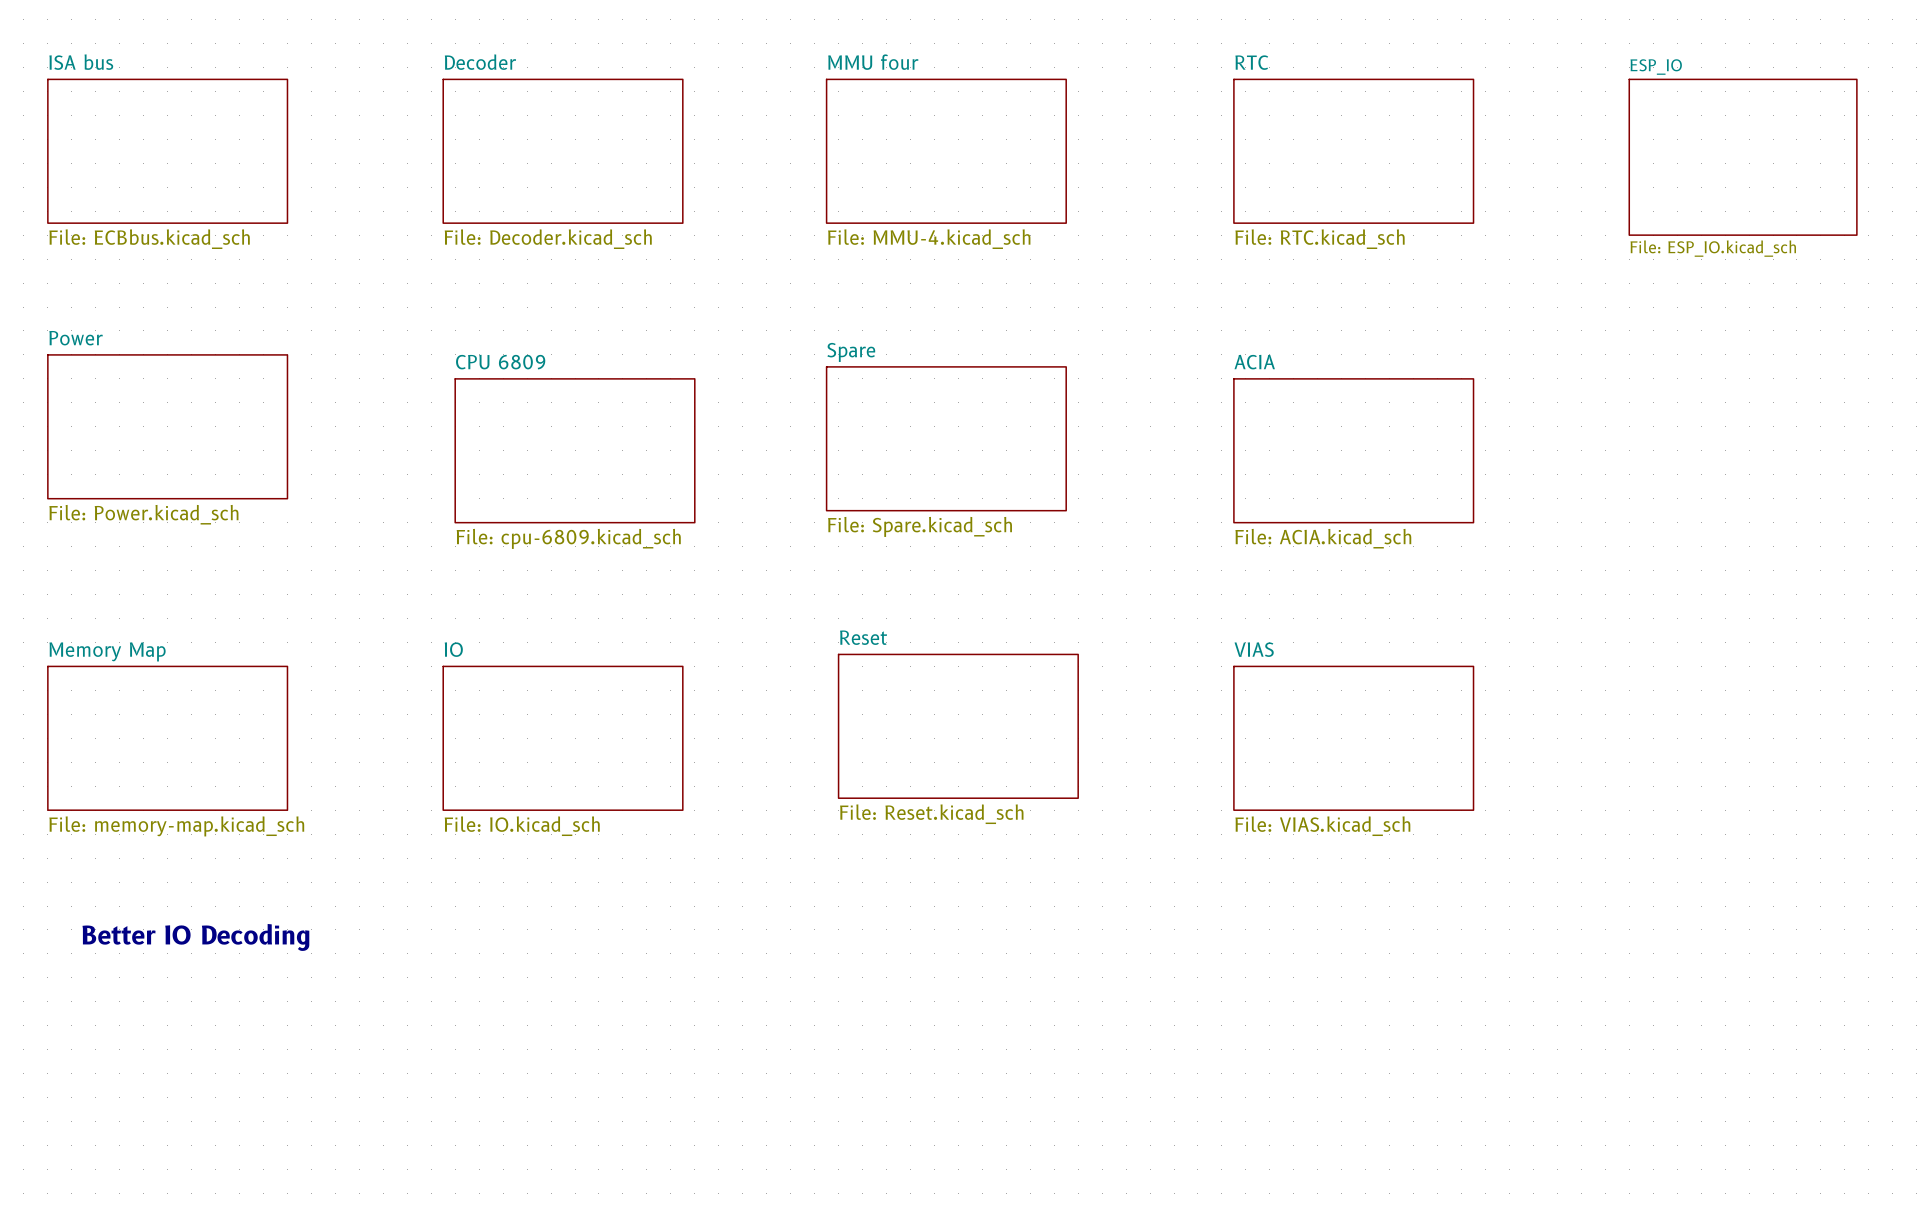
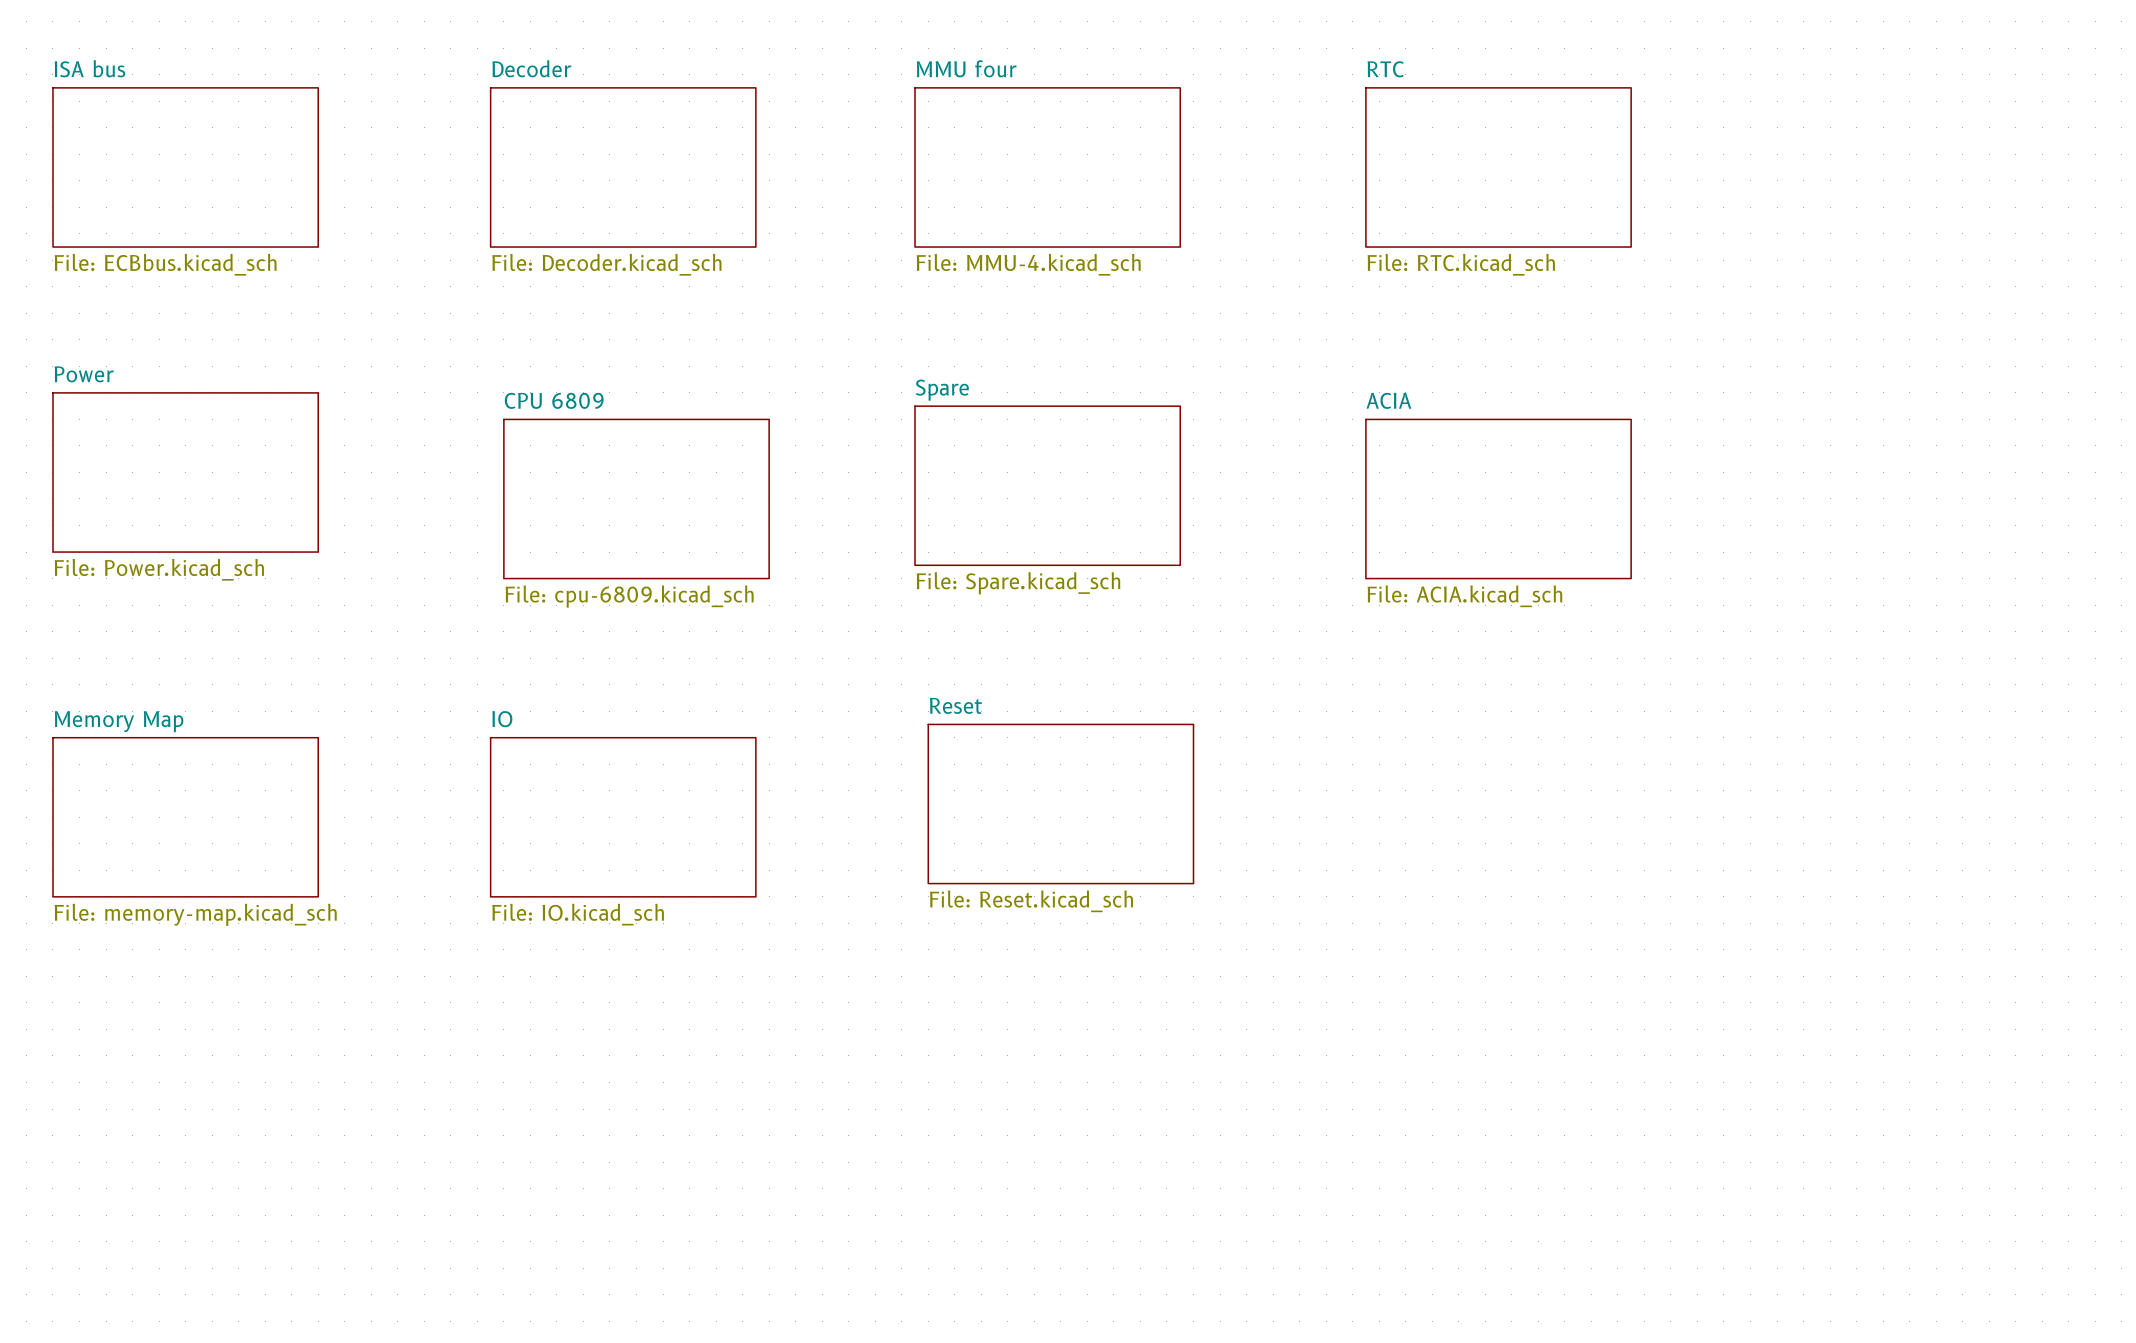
sheet ESP_IO: File: ESP_IO.kicad_sch (1743, 157) -> none
sheet VIAS: File: VIAS.kicad_sch (1353, 738) -> none
text: Better IO Decoding (195, 937) -> none

